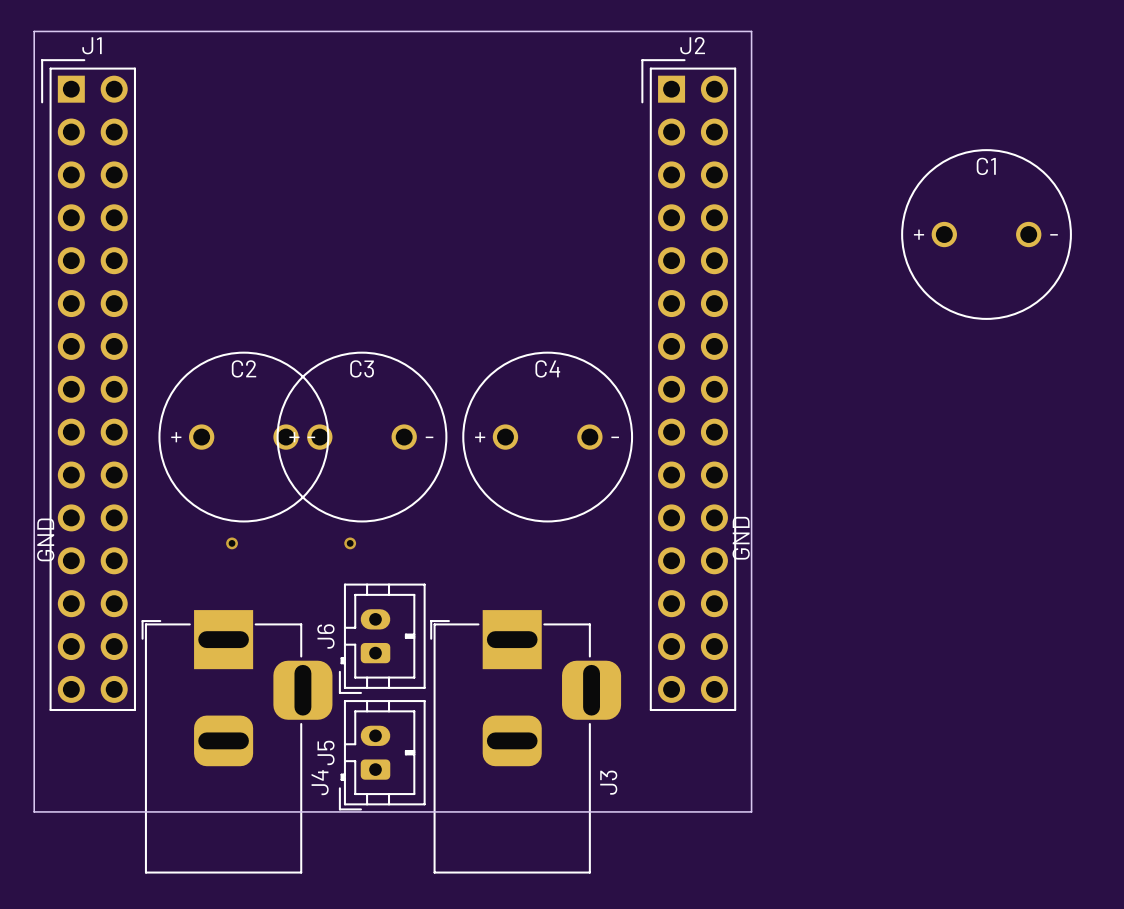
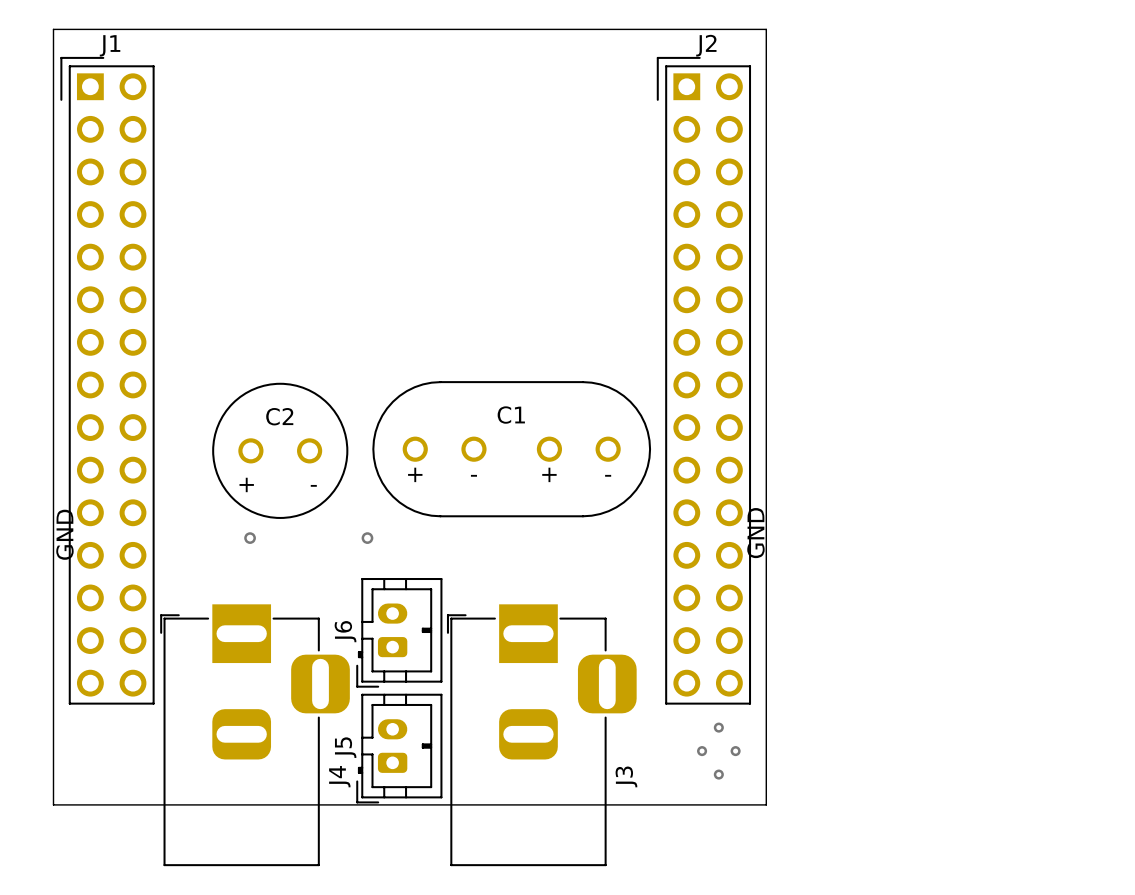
C1 footprint: [901, 149, 1072, 320] -> [372, 381, 652, 518]
C2 footprint: [158, 351, 330, 523] -> [212, 382, 349, 519]
C3: (362, 437) -> none
C4: (547, 437) -> none
via: none -> (718, 727)
via: none -> (702, 751)
via: none -> (735, 751)
via: none -> (718, 774)

